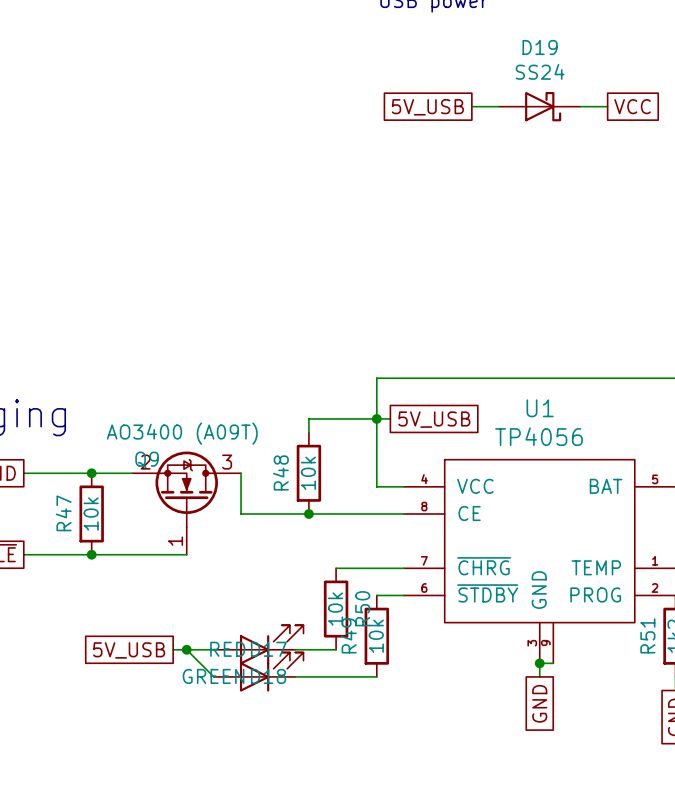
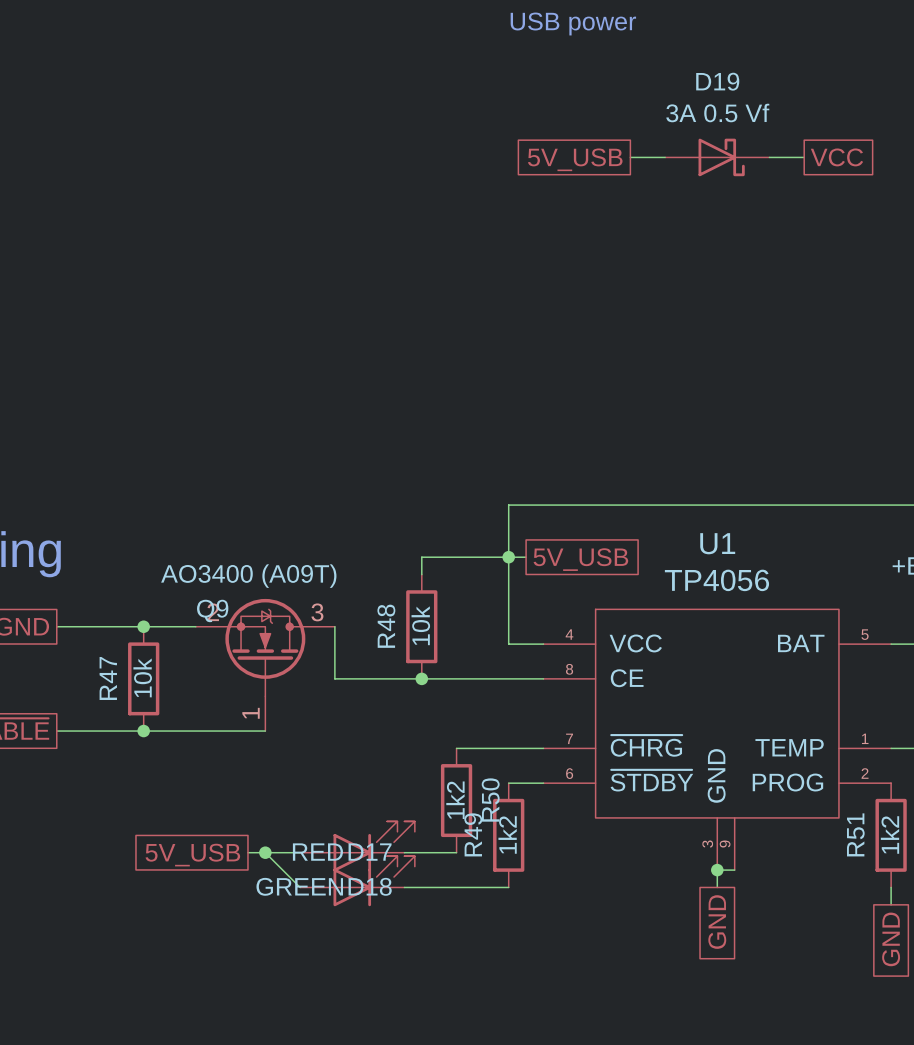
D19 value: SS24 (540, 71) -> 3A 0.5 Vf (717, 113)
R50 value: 10k (335, 609) -> 1k2 (455, 800)
R49 value: 10k (376, 636) -> 1k2 (507, 834)

